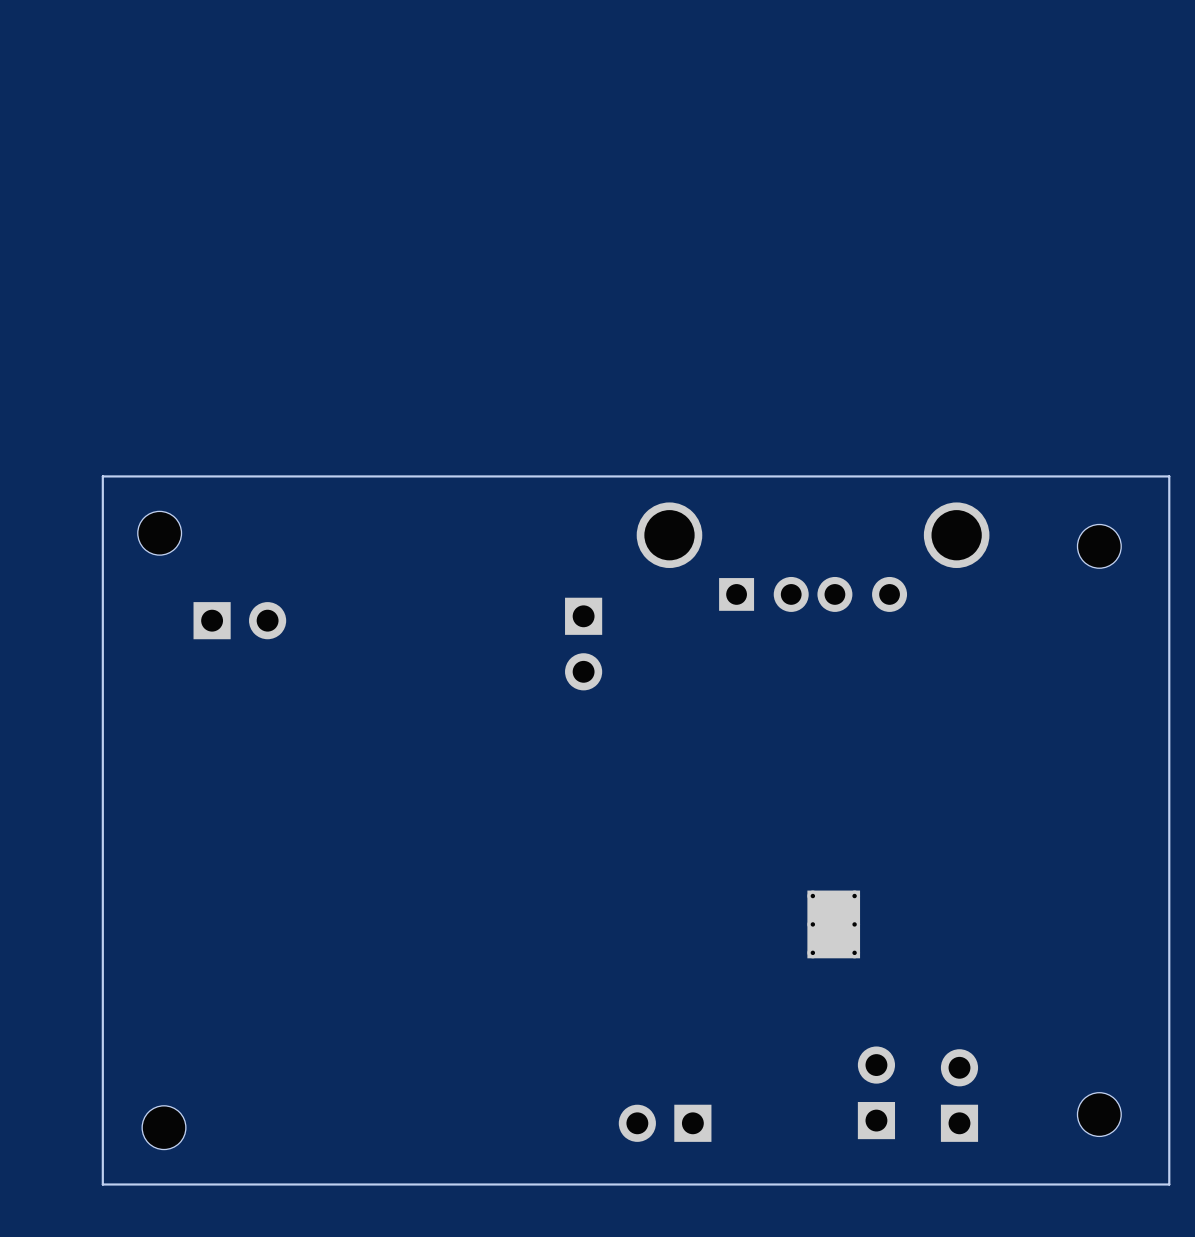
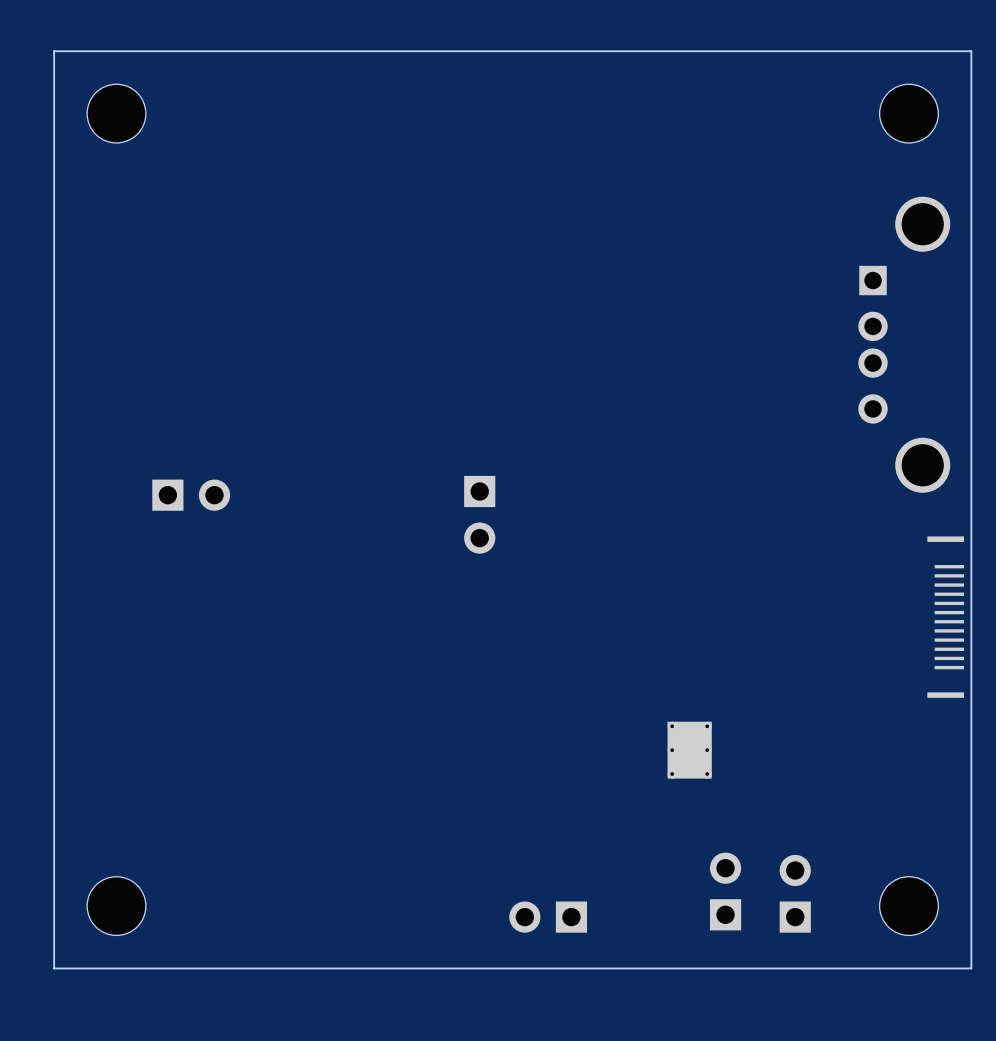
part: none -> (116, 113)
part: none -> (908, 113)
board edge: (1169, 476) (102, 476) (102, 1184) -> (971, 374) (971, 51) (54, 51) (54, 968) (76, 968)
part: (159, 533) -> none
part: (1099, 546) -> none
part rotation: 0° (813, 557) -> 90° clockwise (904, 344)
part position: (813, 557) -> (904, 344)
part: none -> (945, 617)
part footprint: [1077, 1092, 1122, 1137] -> [879, 876, 939, 936]
part footprint: [142, 1105, 186, 1150] -> [87, 876, 146, 936]

